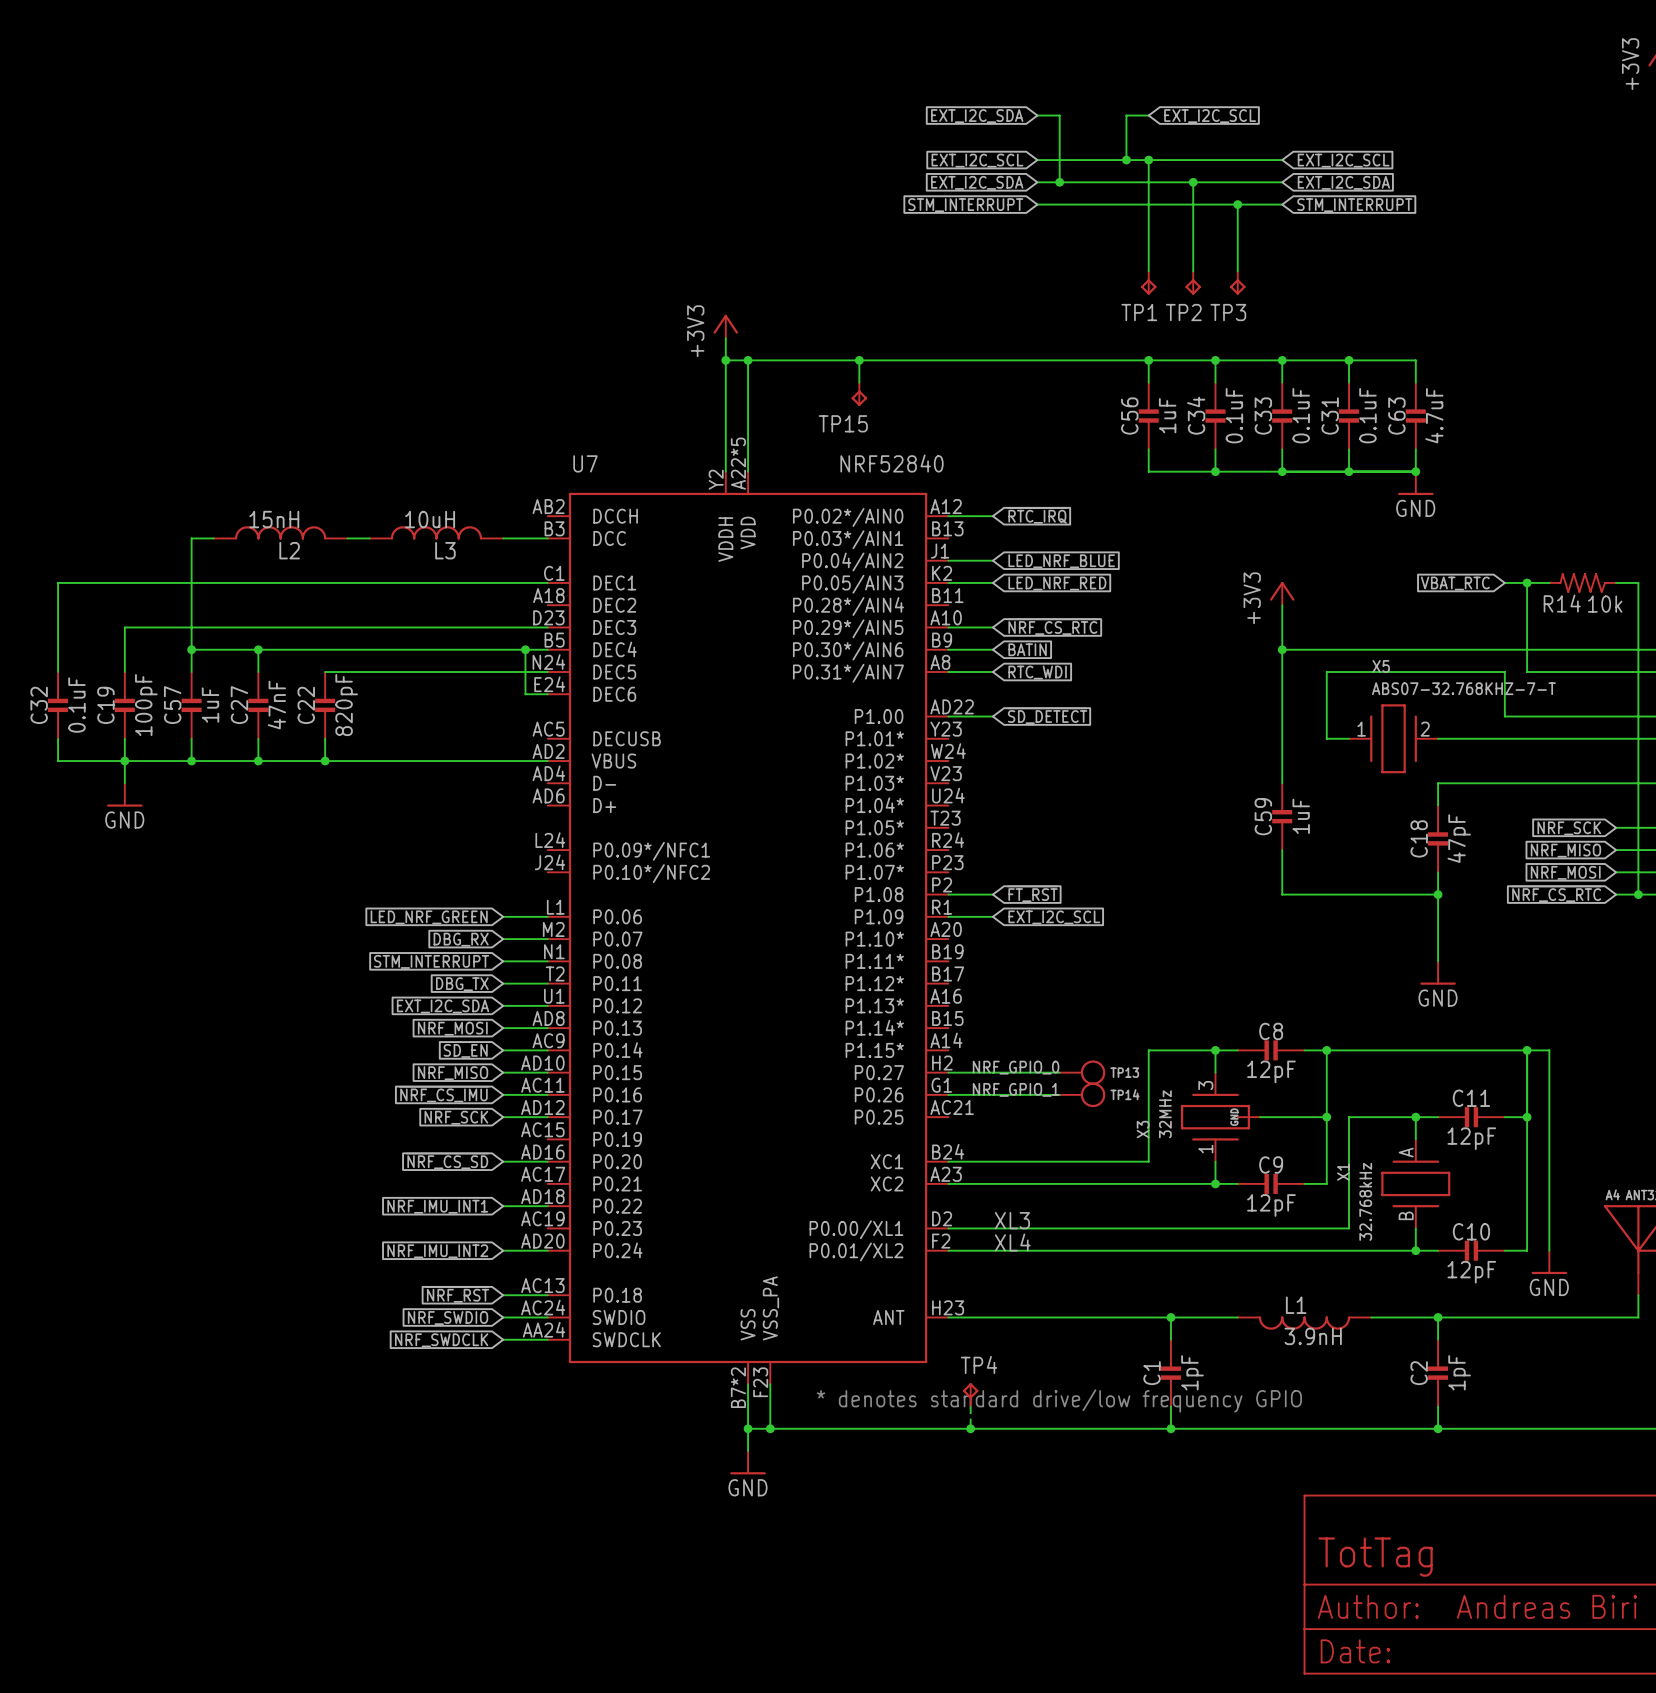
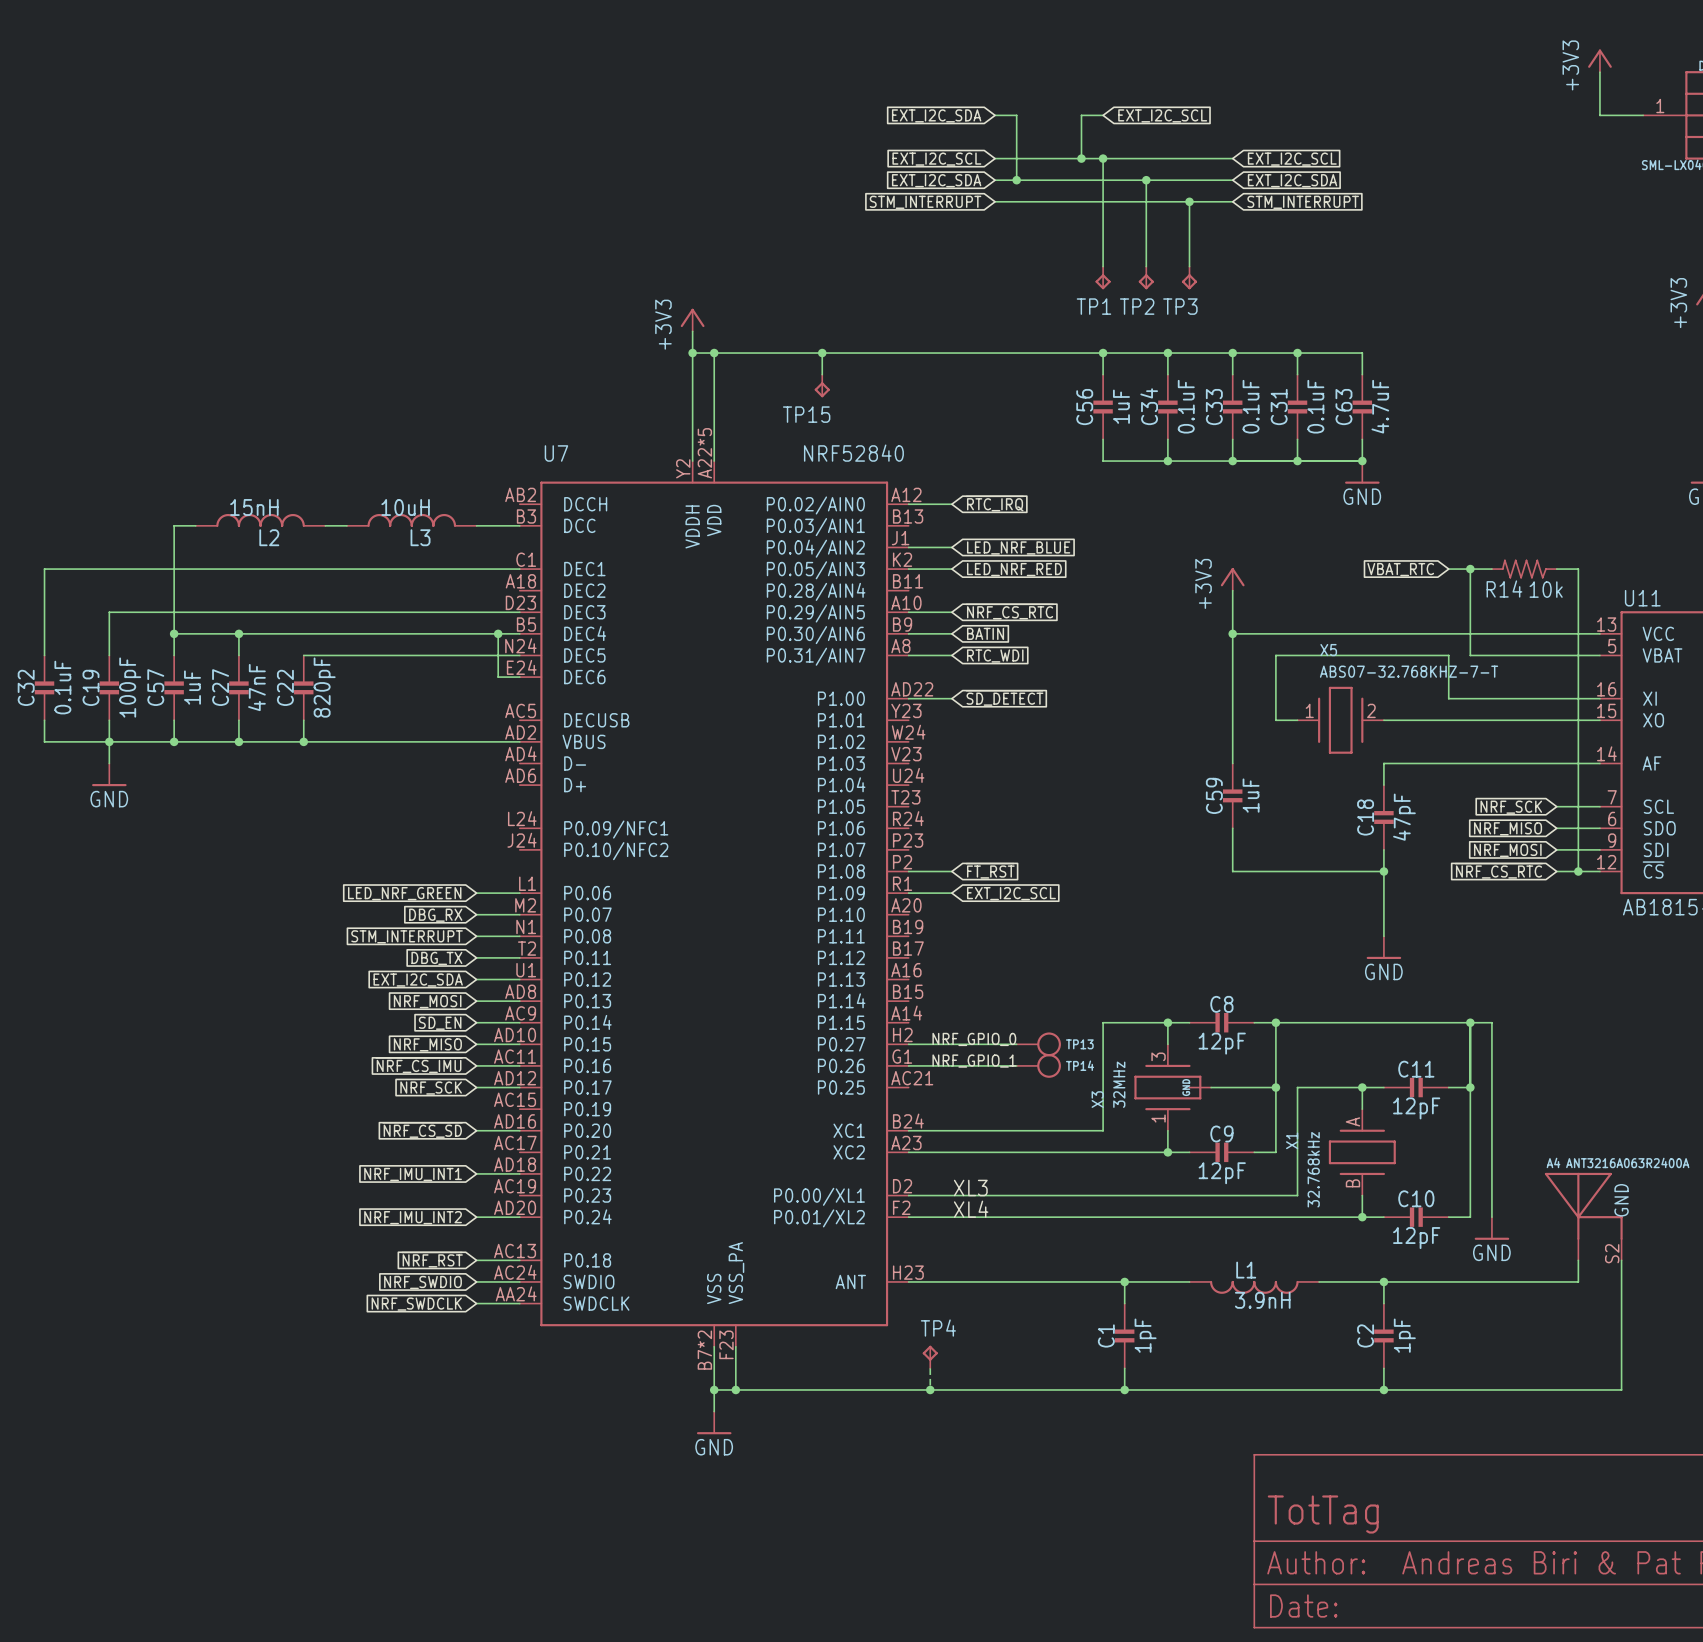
U7 symbol: [547, 471, 949, 1385] -> [519, 461, 909, 1347]

